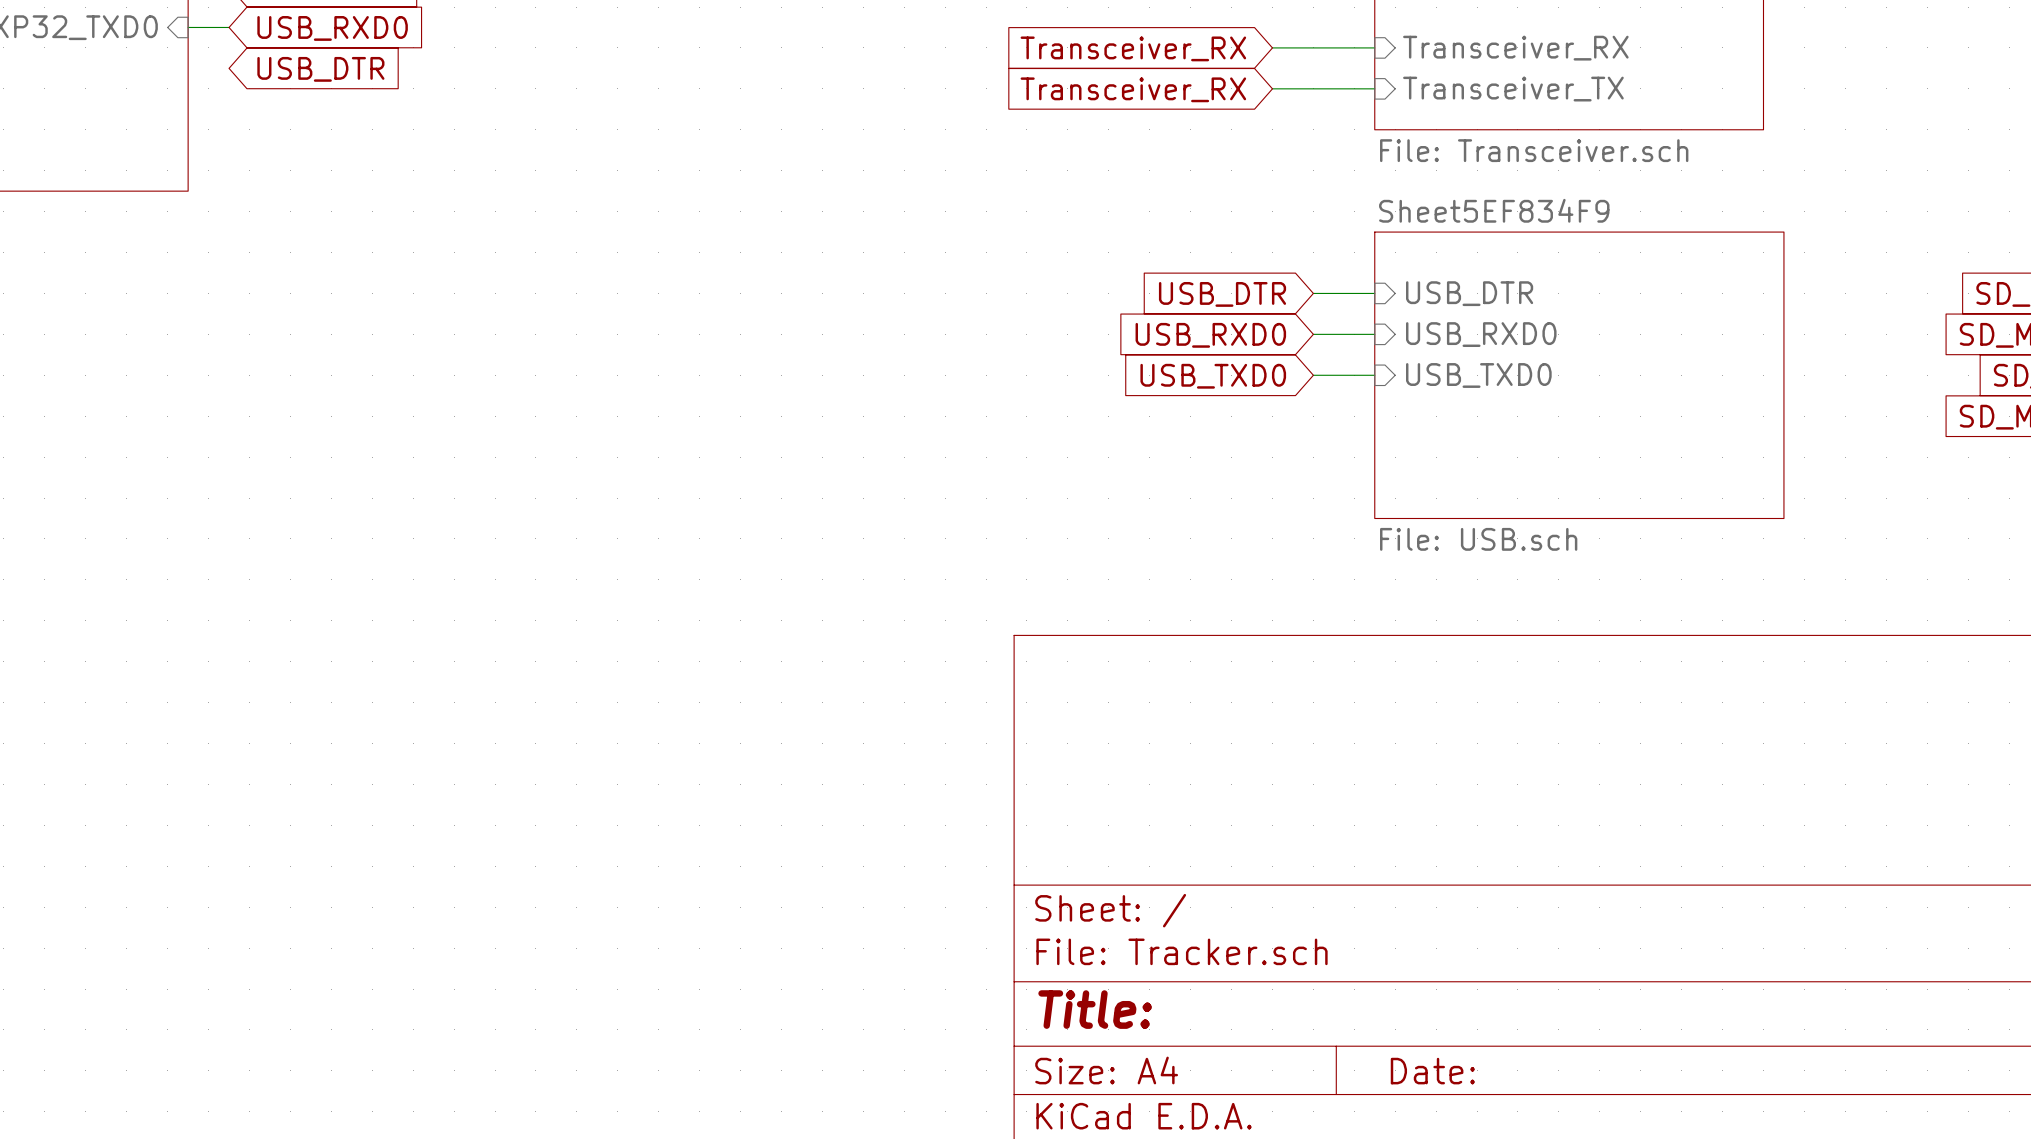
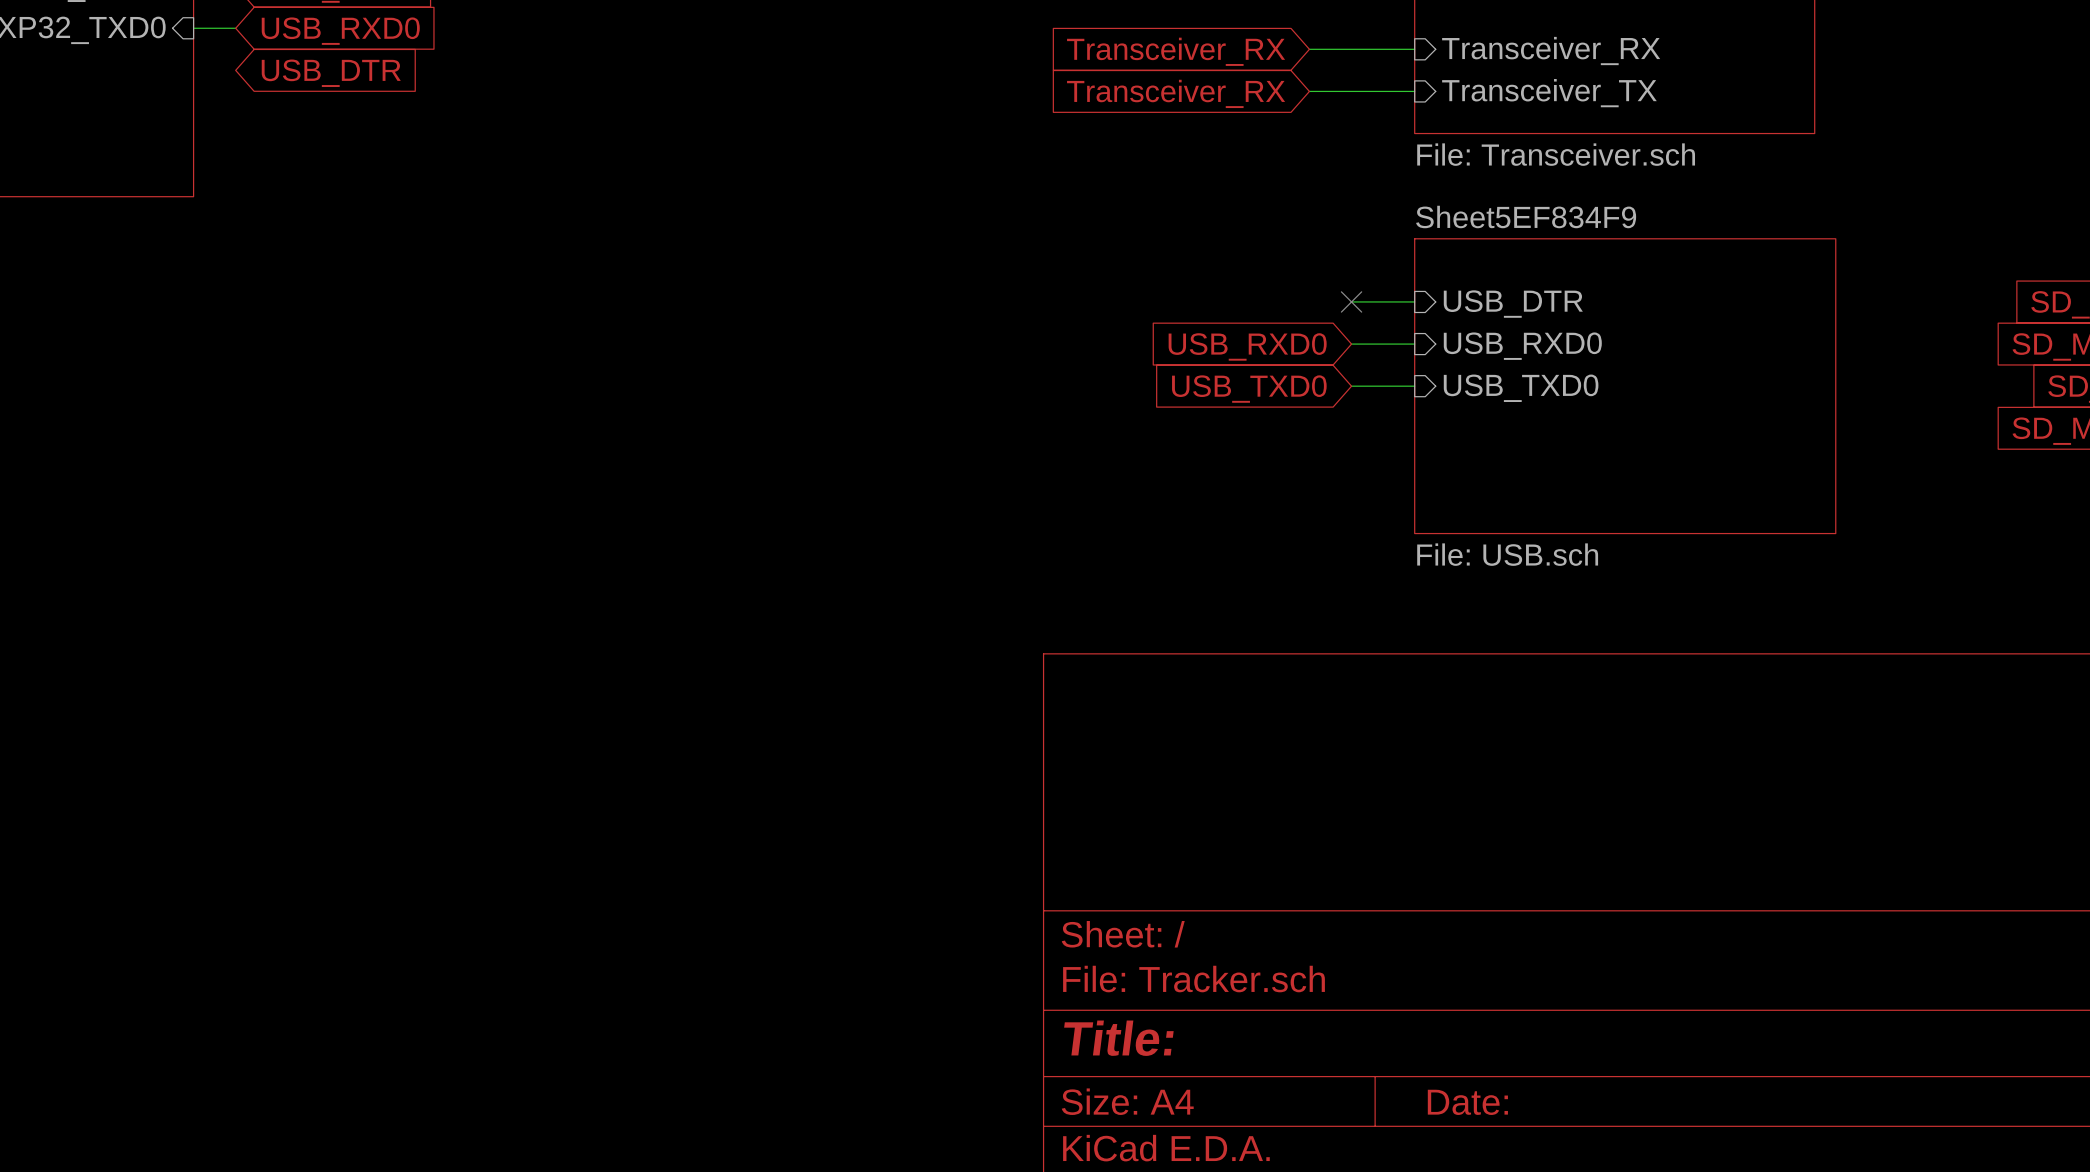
no-connect mark: none -> (1351, 301)
global label: USB_DTR (1222, 294) -> none

